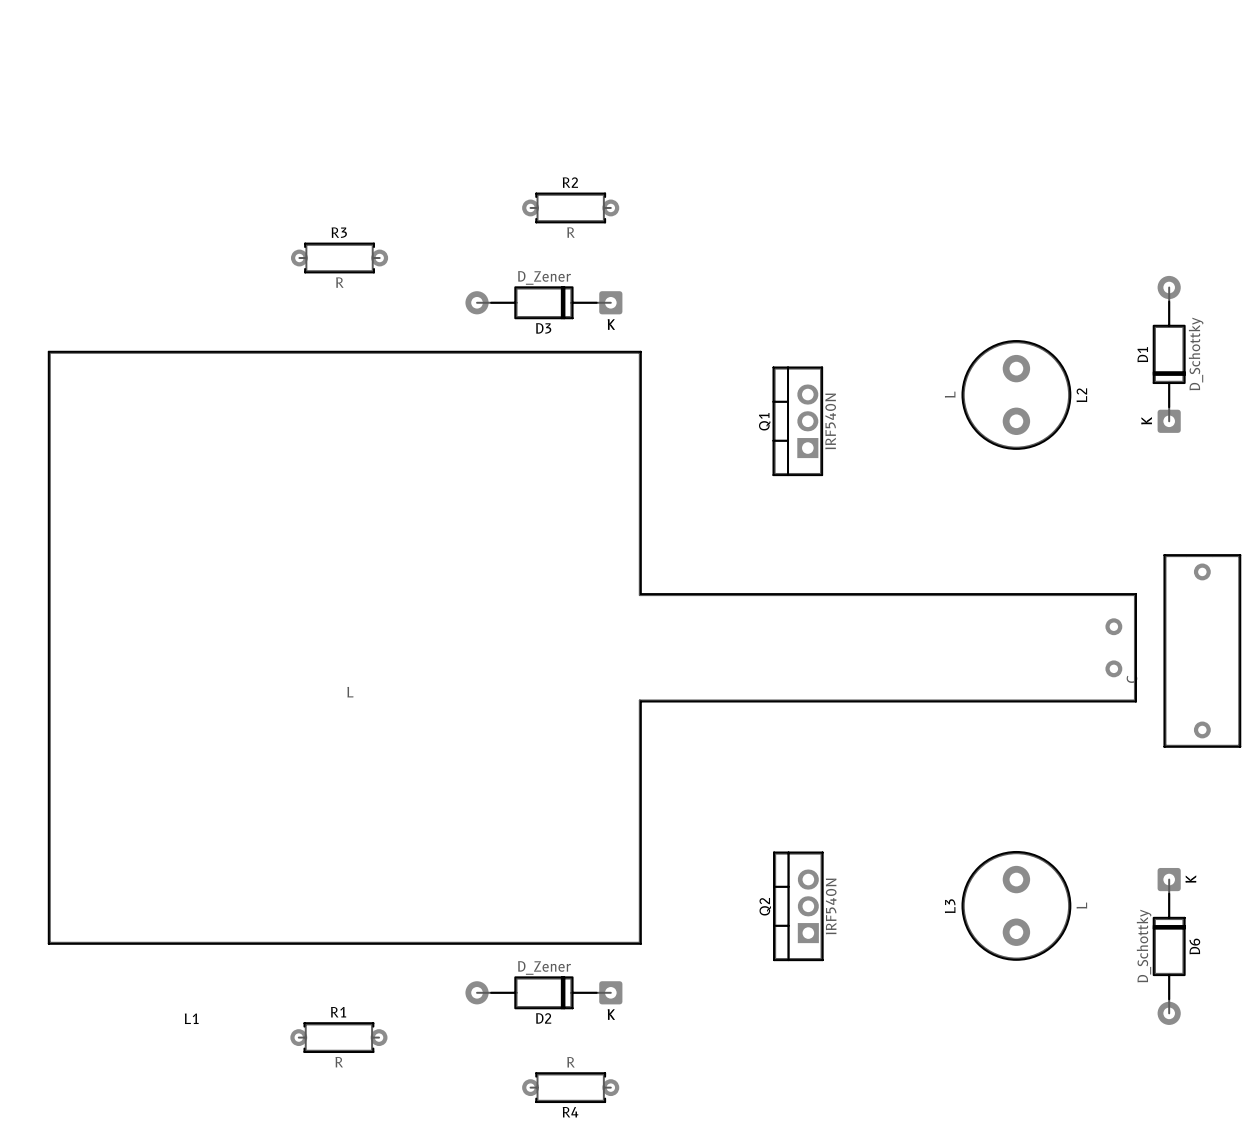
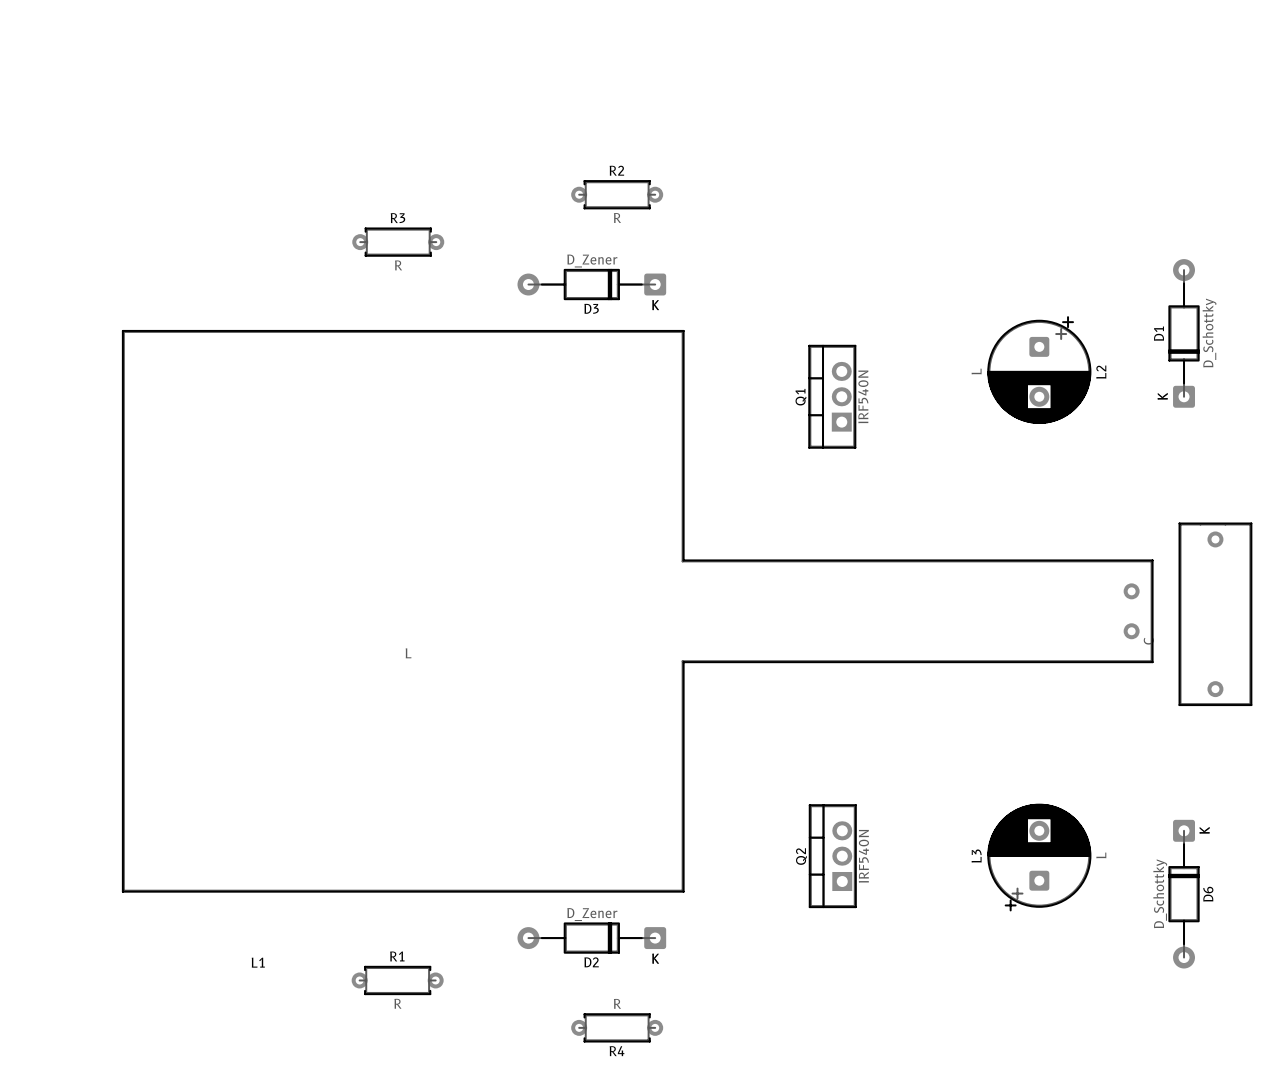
L2 footprint: [961, 340, 1071, 450] -> [987, 316, 1092, 424]
L3 footprint: [961, 851, 1071, 961] -> [987, 804, 1092, 912]

